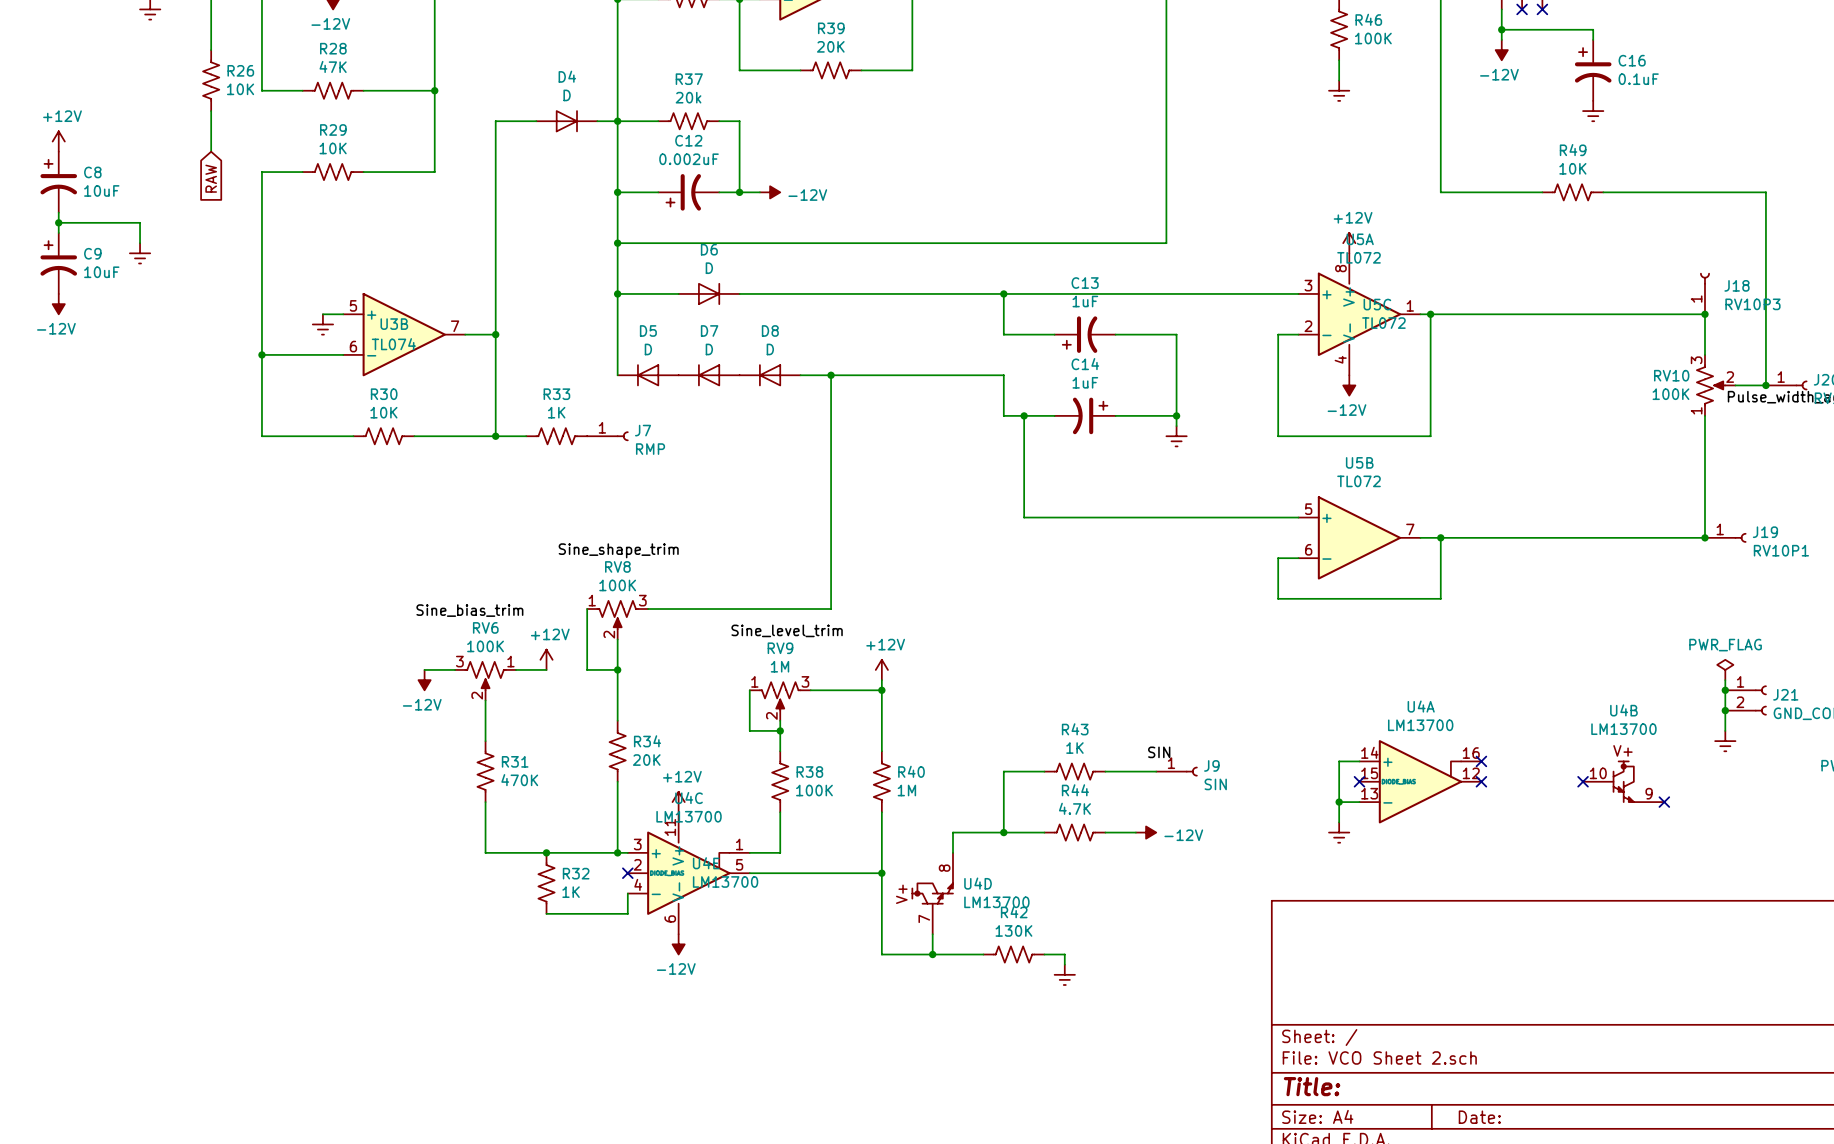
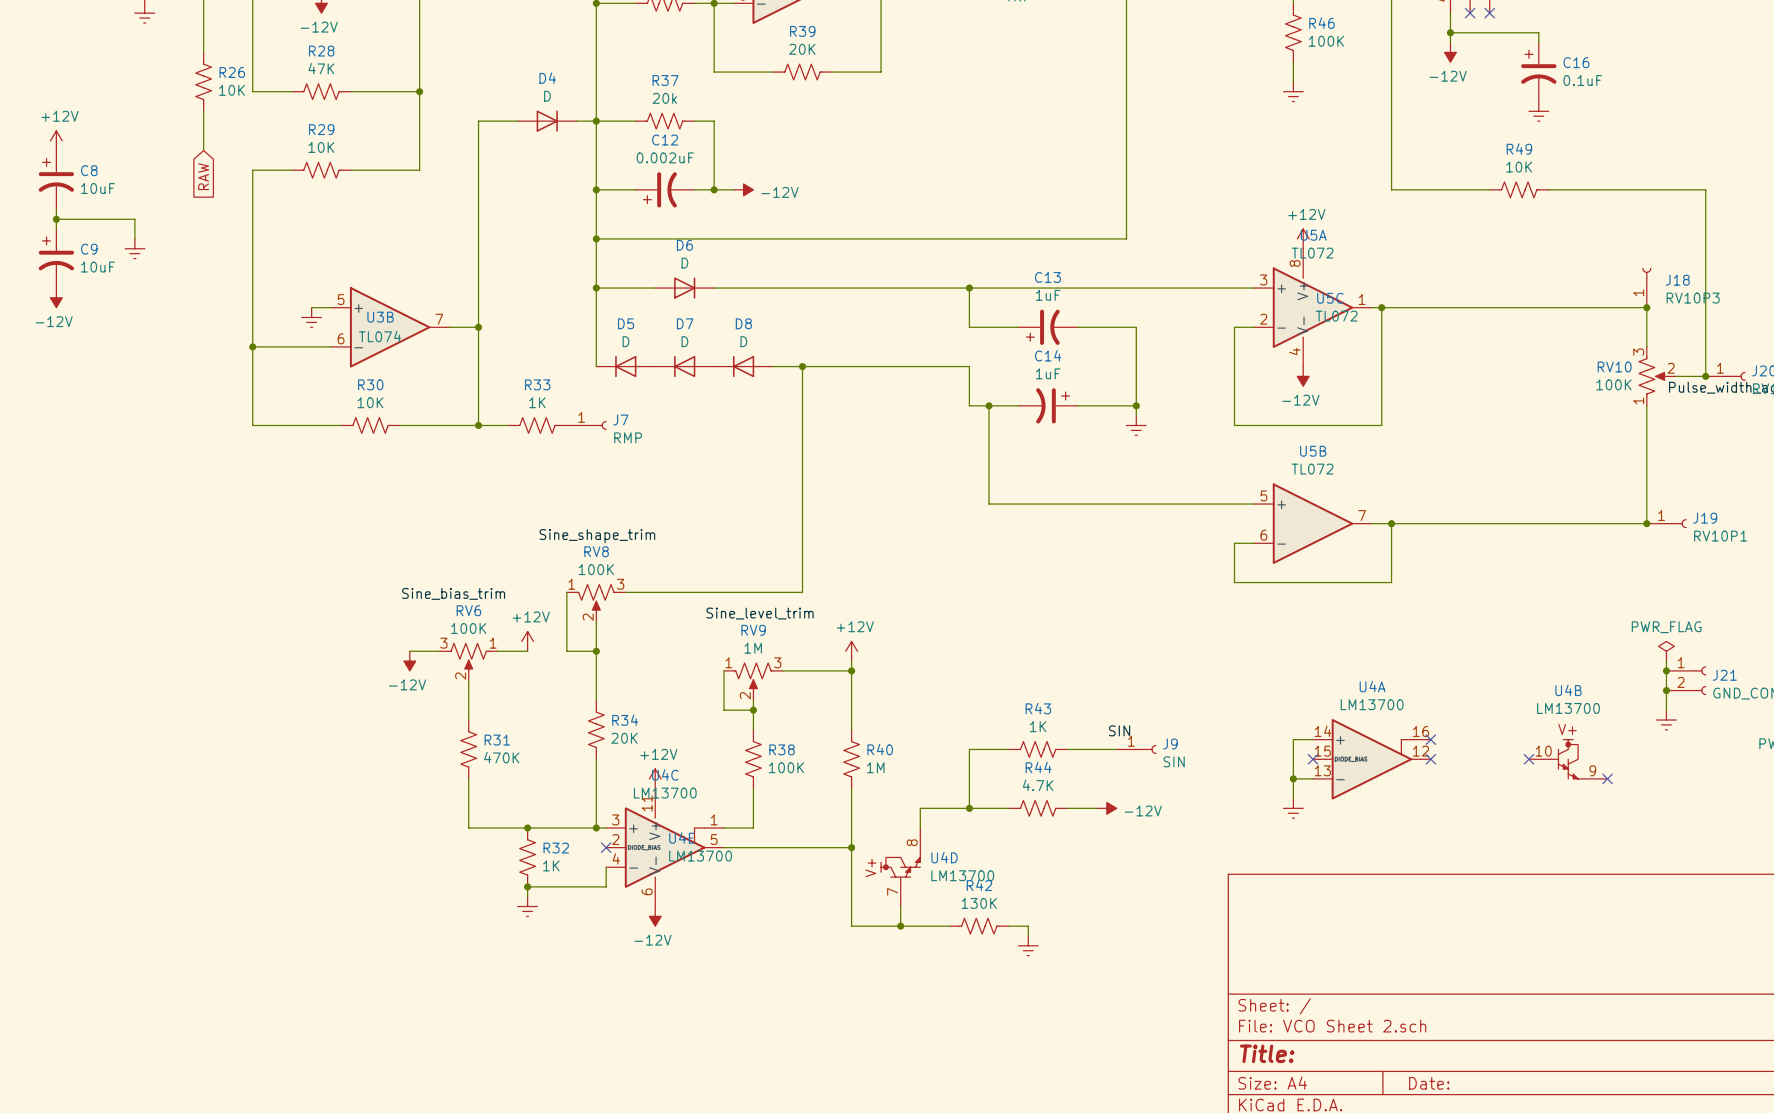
wire: none -> (527, 886) (527, 896)
junction: none -> (527, 886)
power symbol: none -> (527, 906)

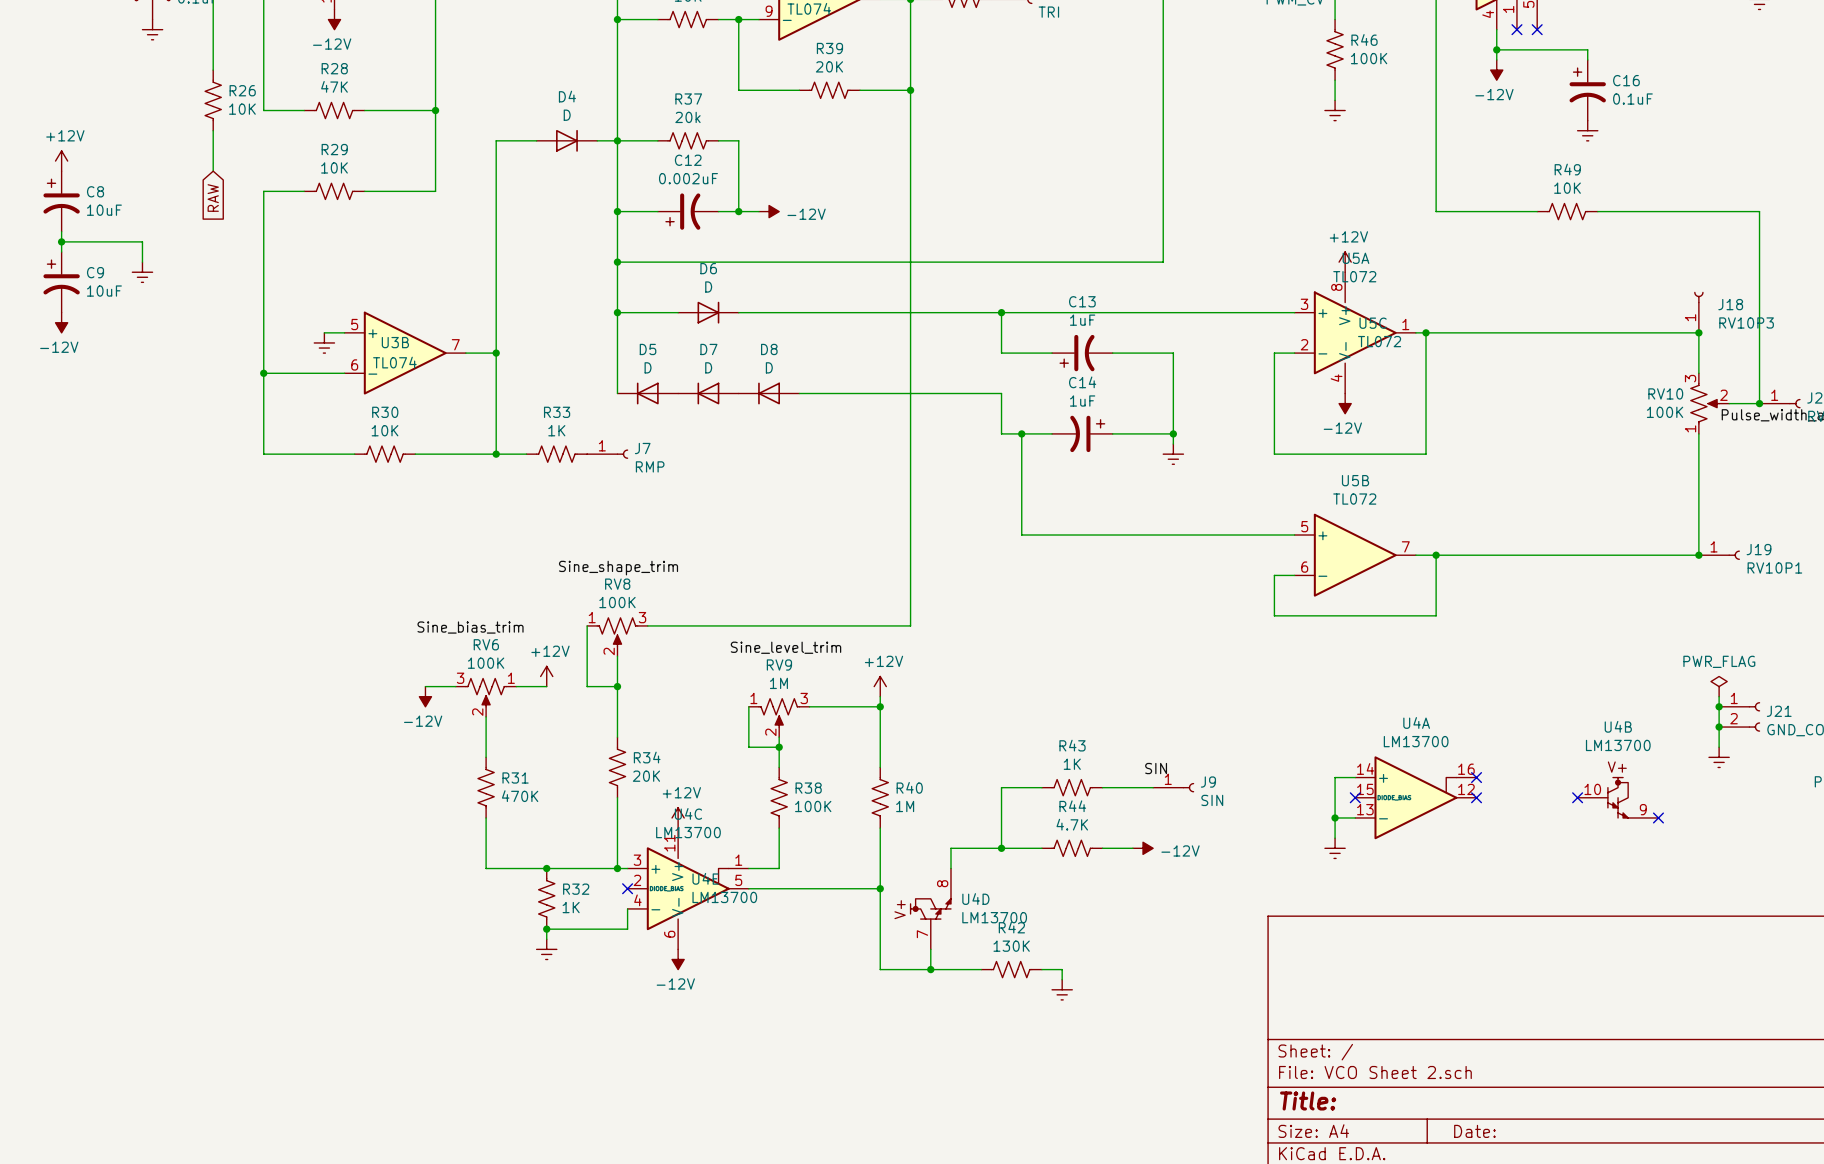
junction: none -> (910, 90)
wire: (802, 366) (802, 592) -> (910, 90) (910, 625) (829, 625)
junction: (802, 366) -> none

